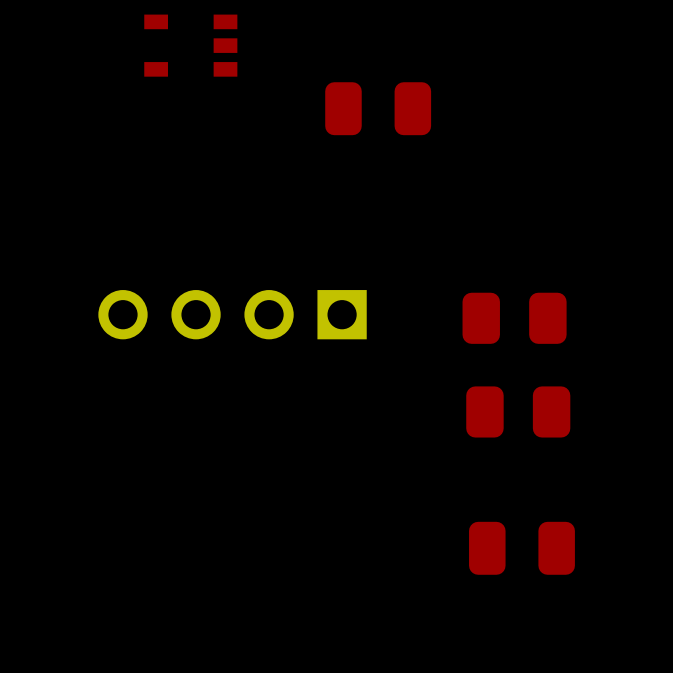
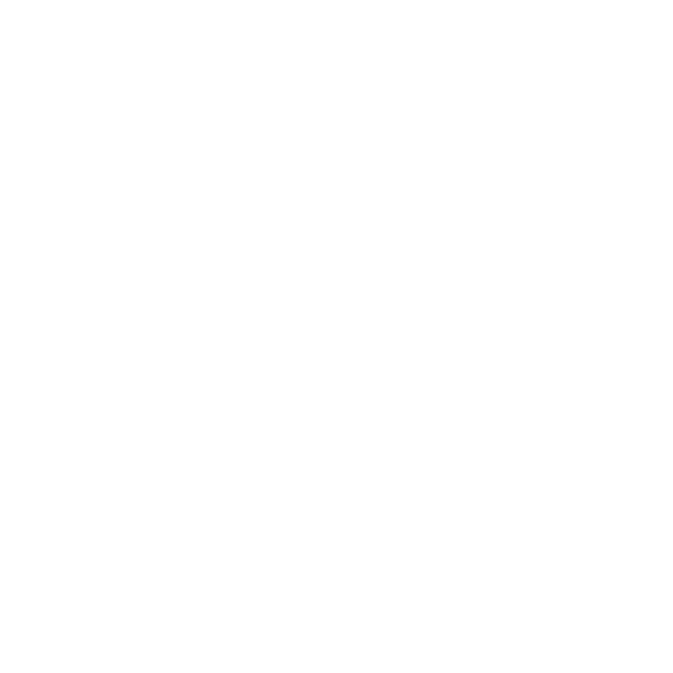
part: (190, 45) -> none
part: (378, 108) -> none
part: (232, 314) -> none
part: (514, 318) -> none
part: (518, 411) -> none
part: (521, 548) -> none

